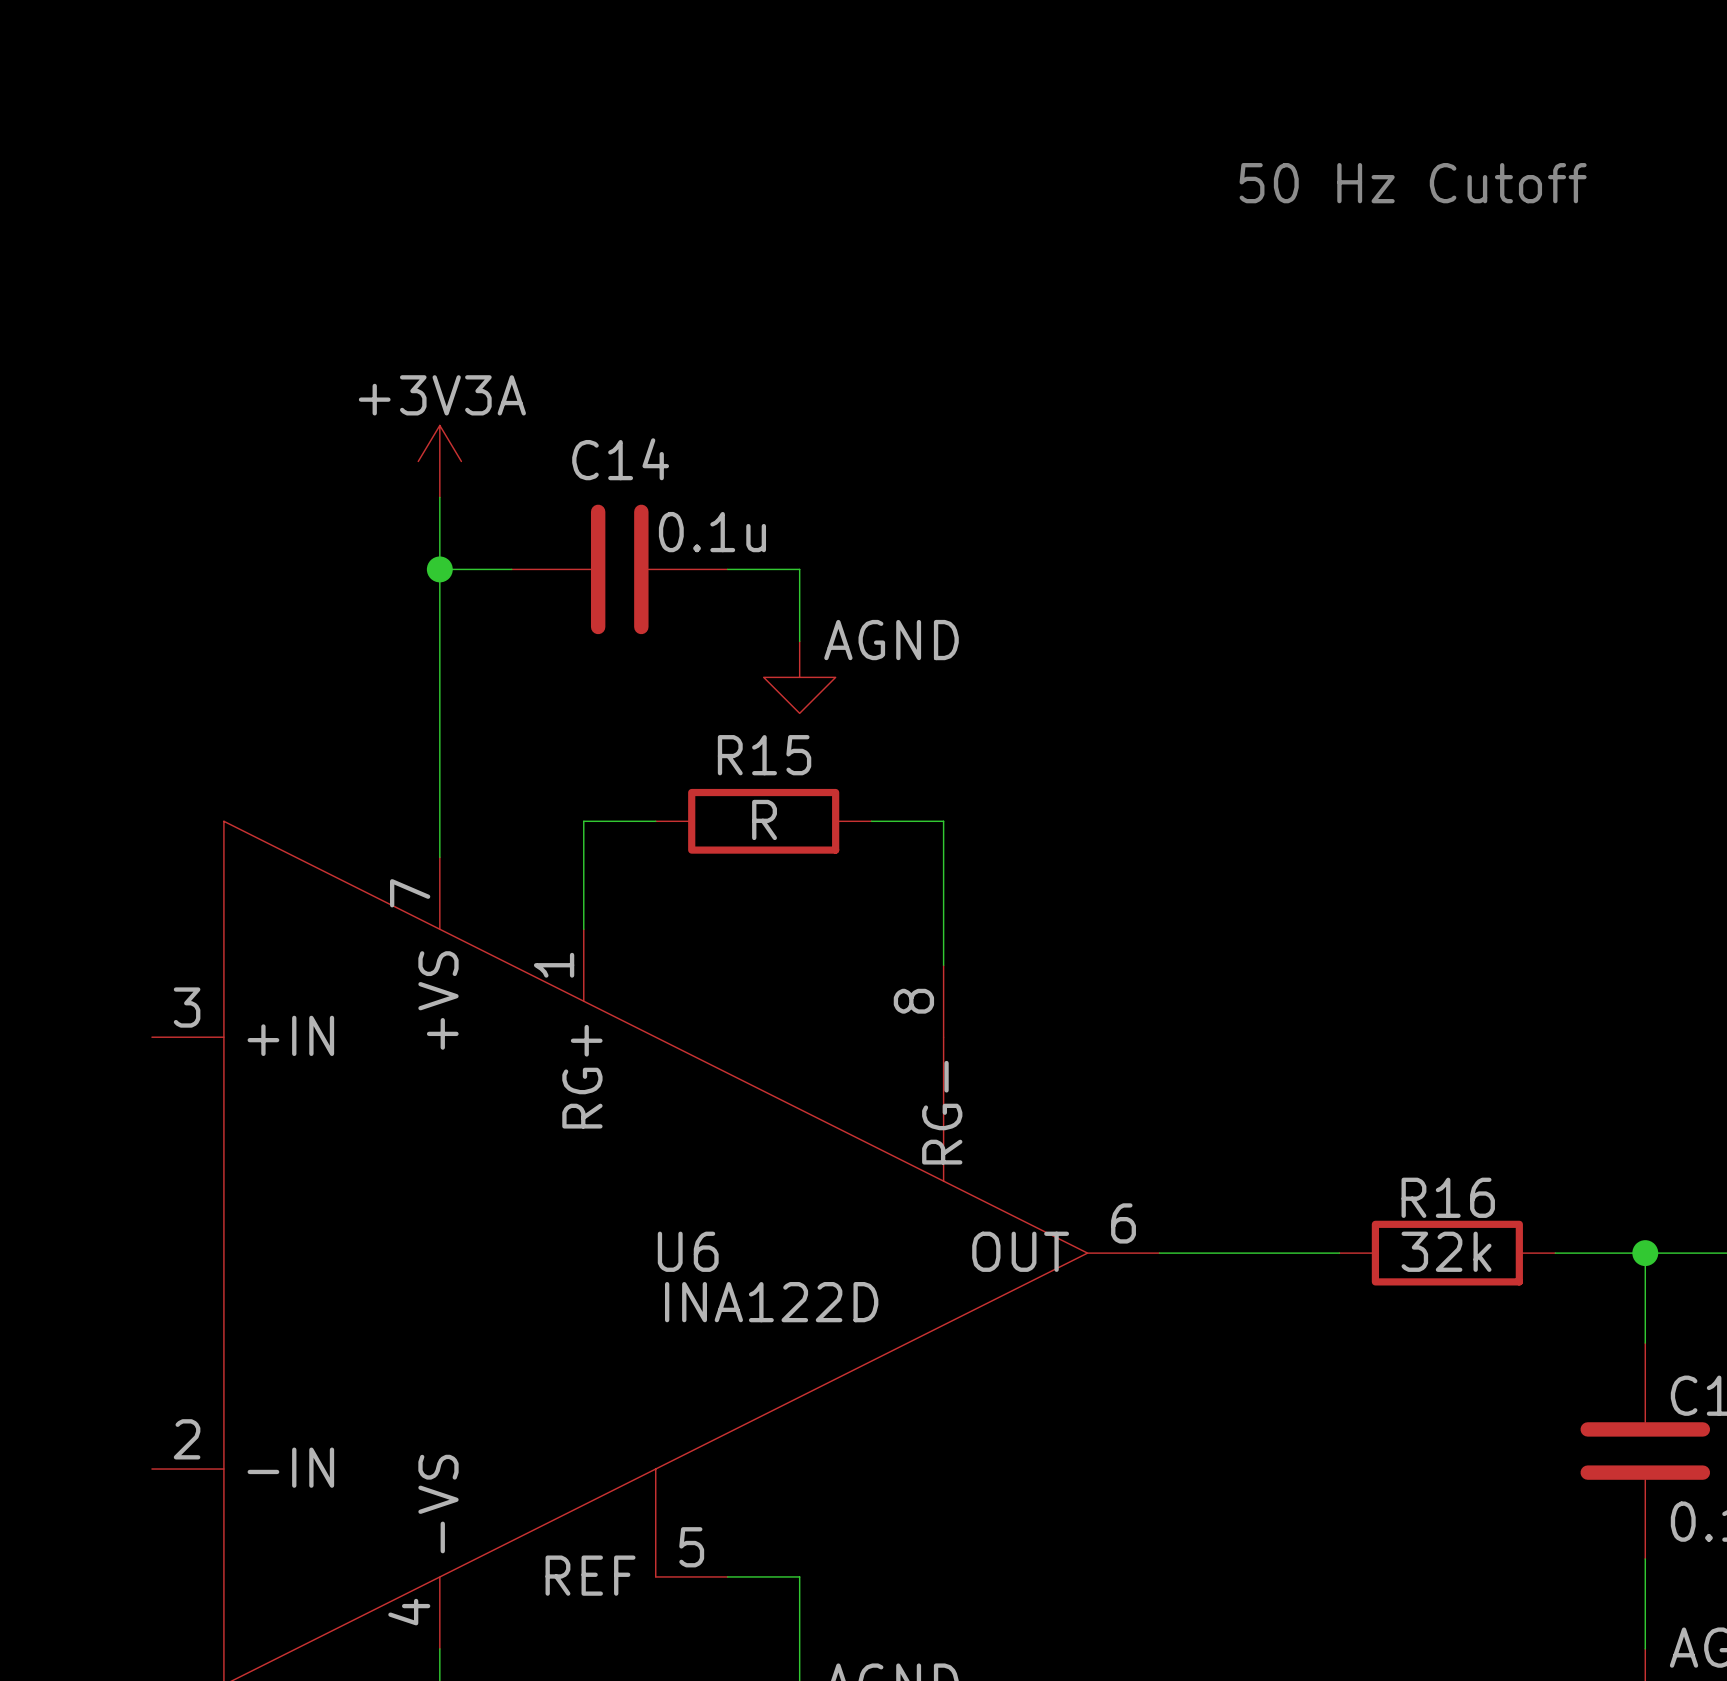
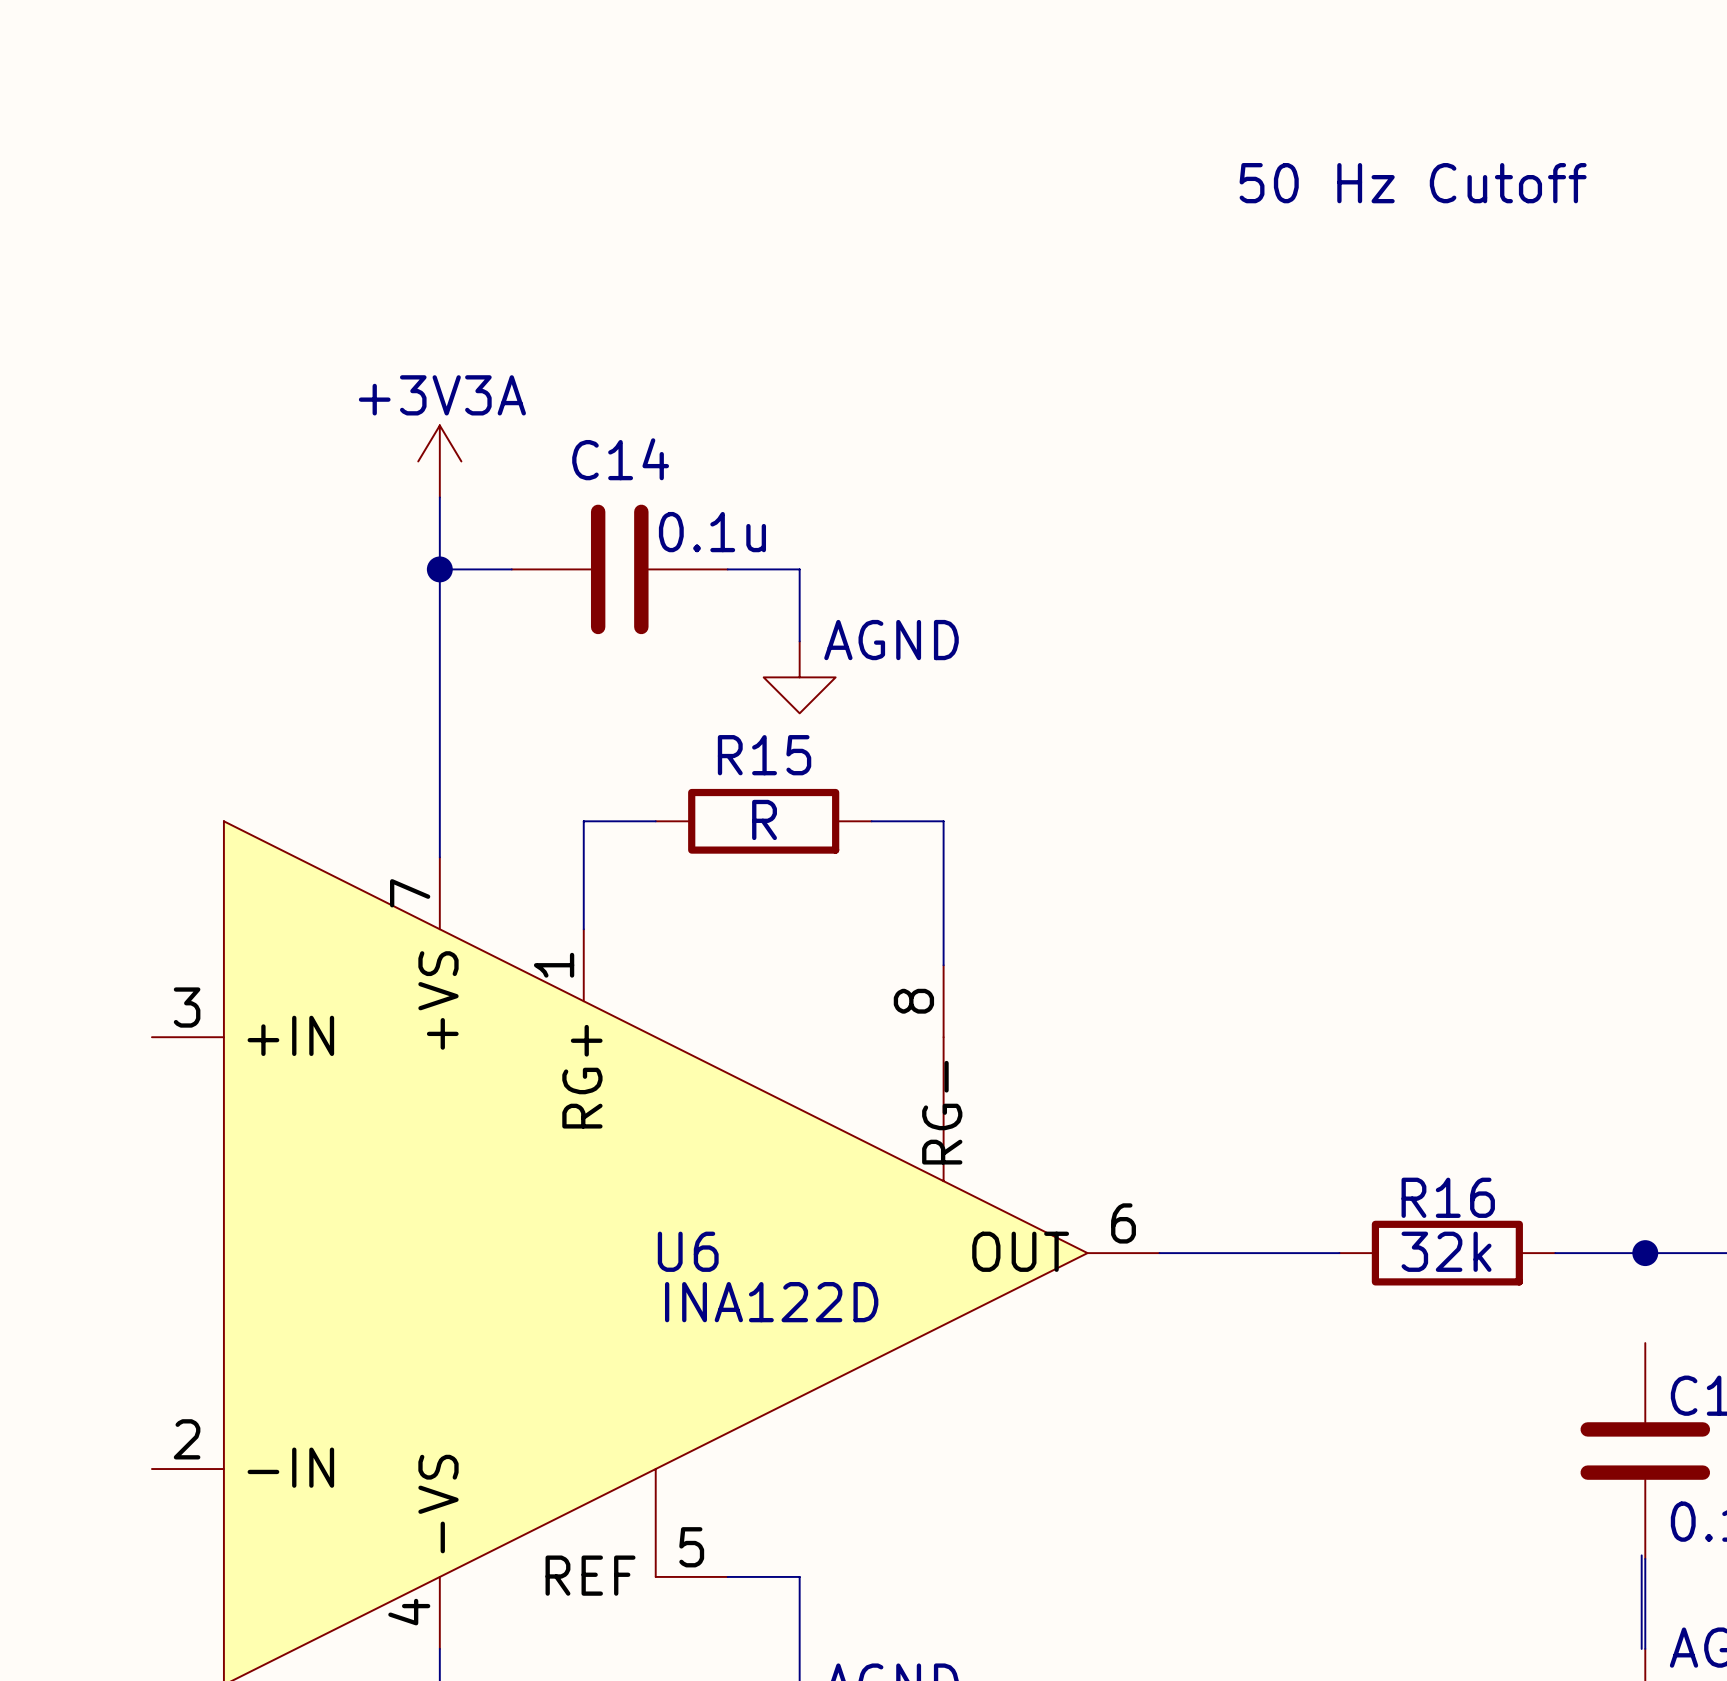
wire: (1645, 1253) (1645, 1343) -> none
wire: none -> (1641, 1555) (1641, 1648)

